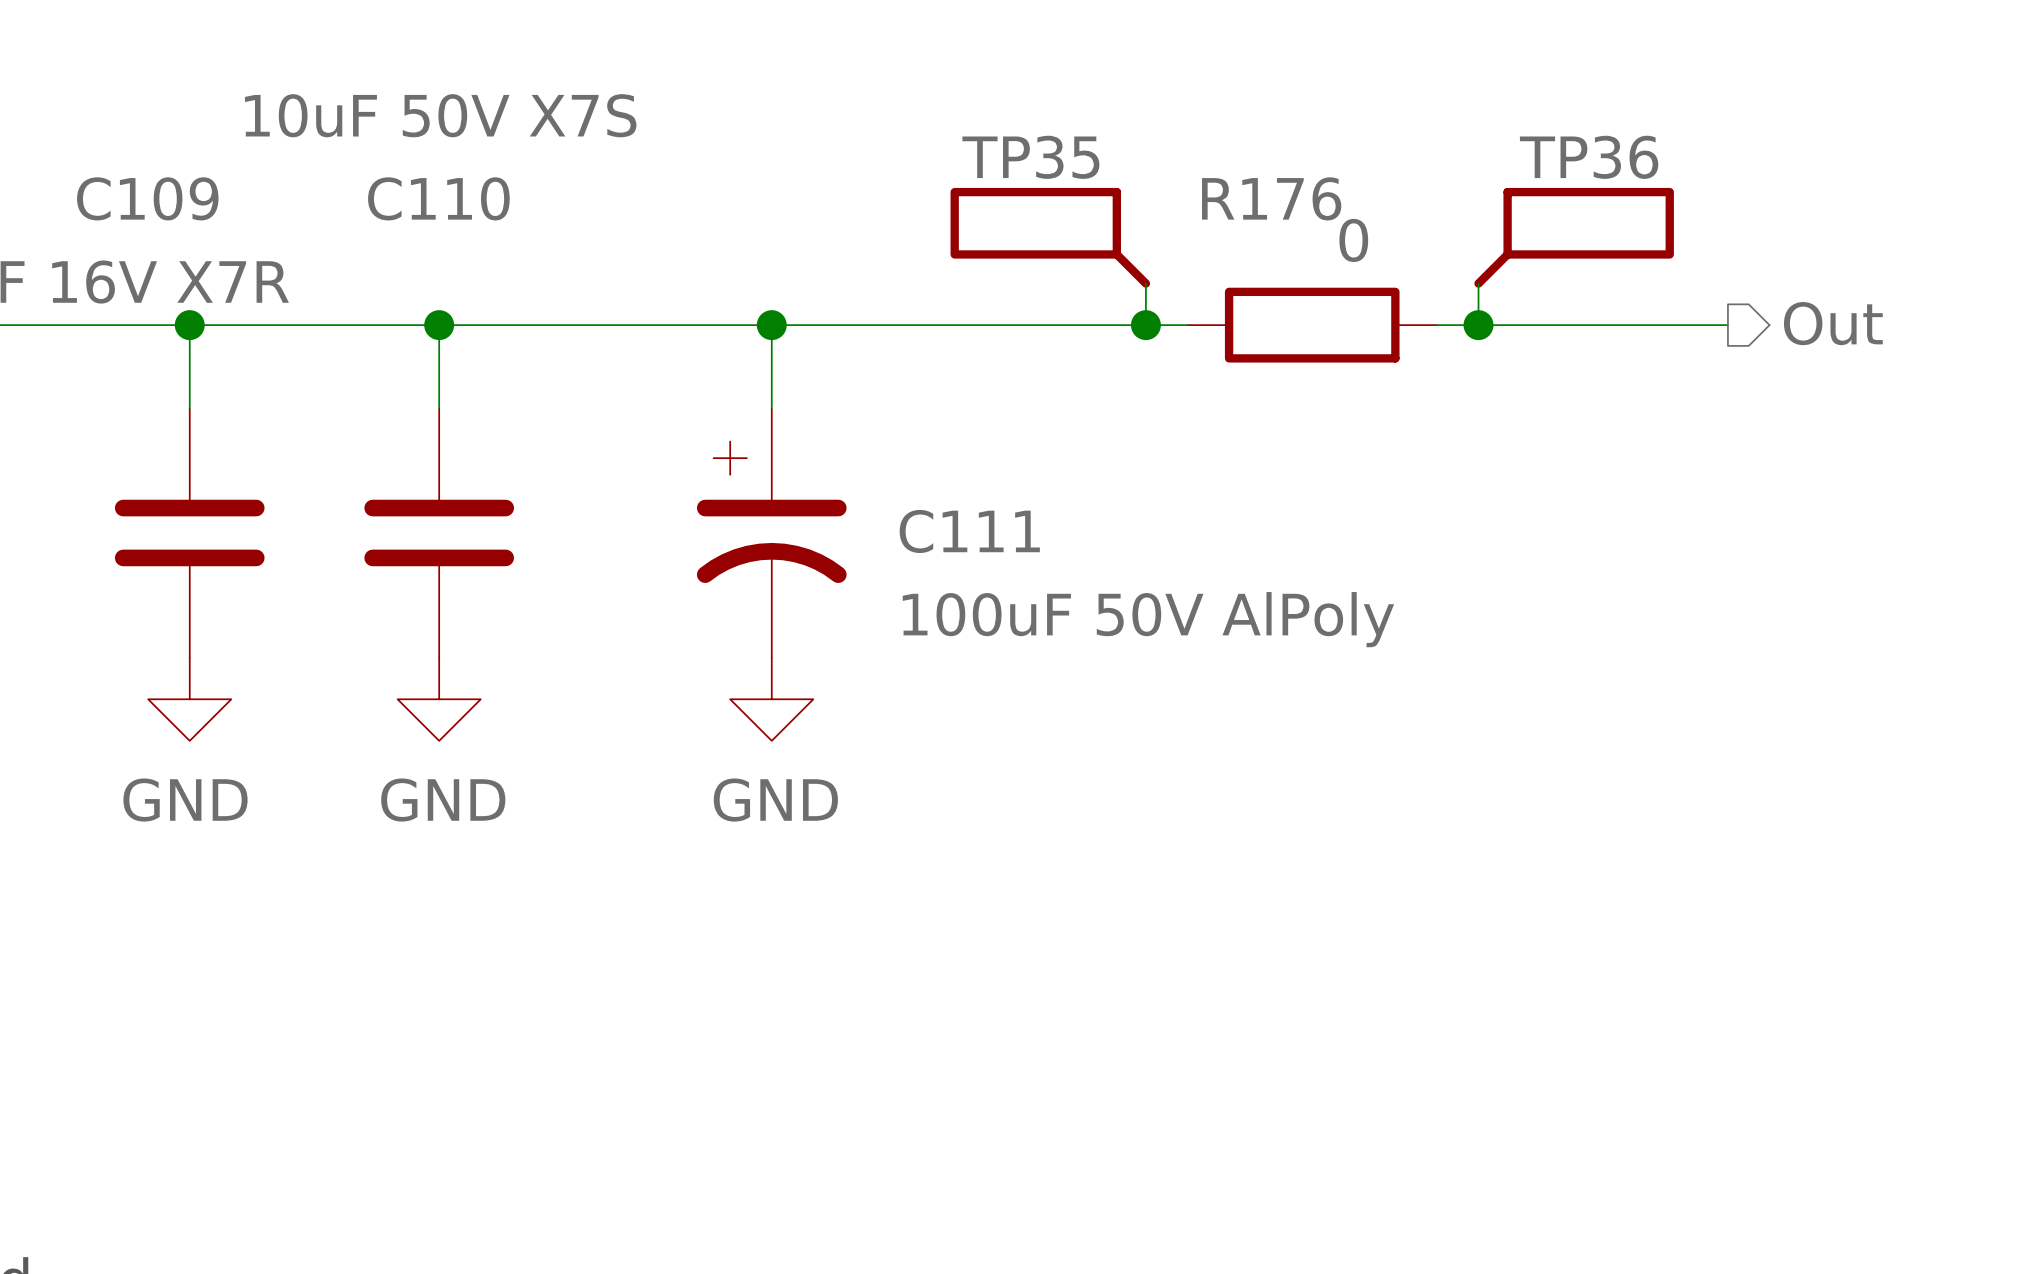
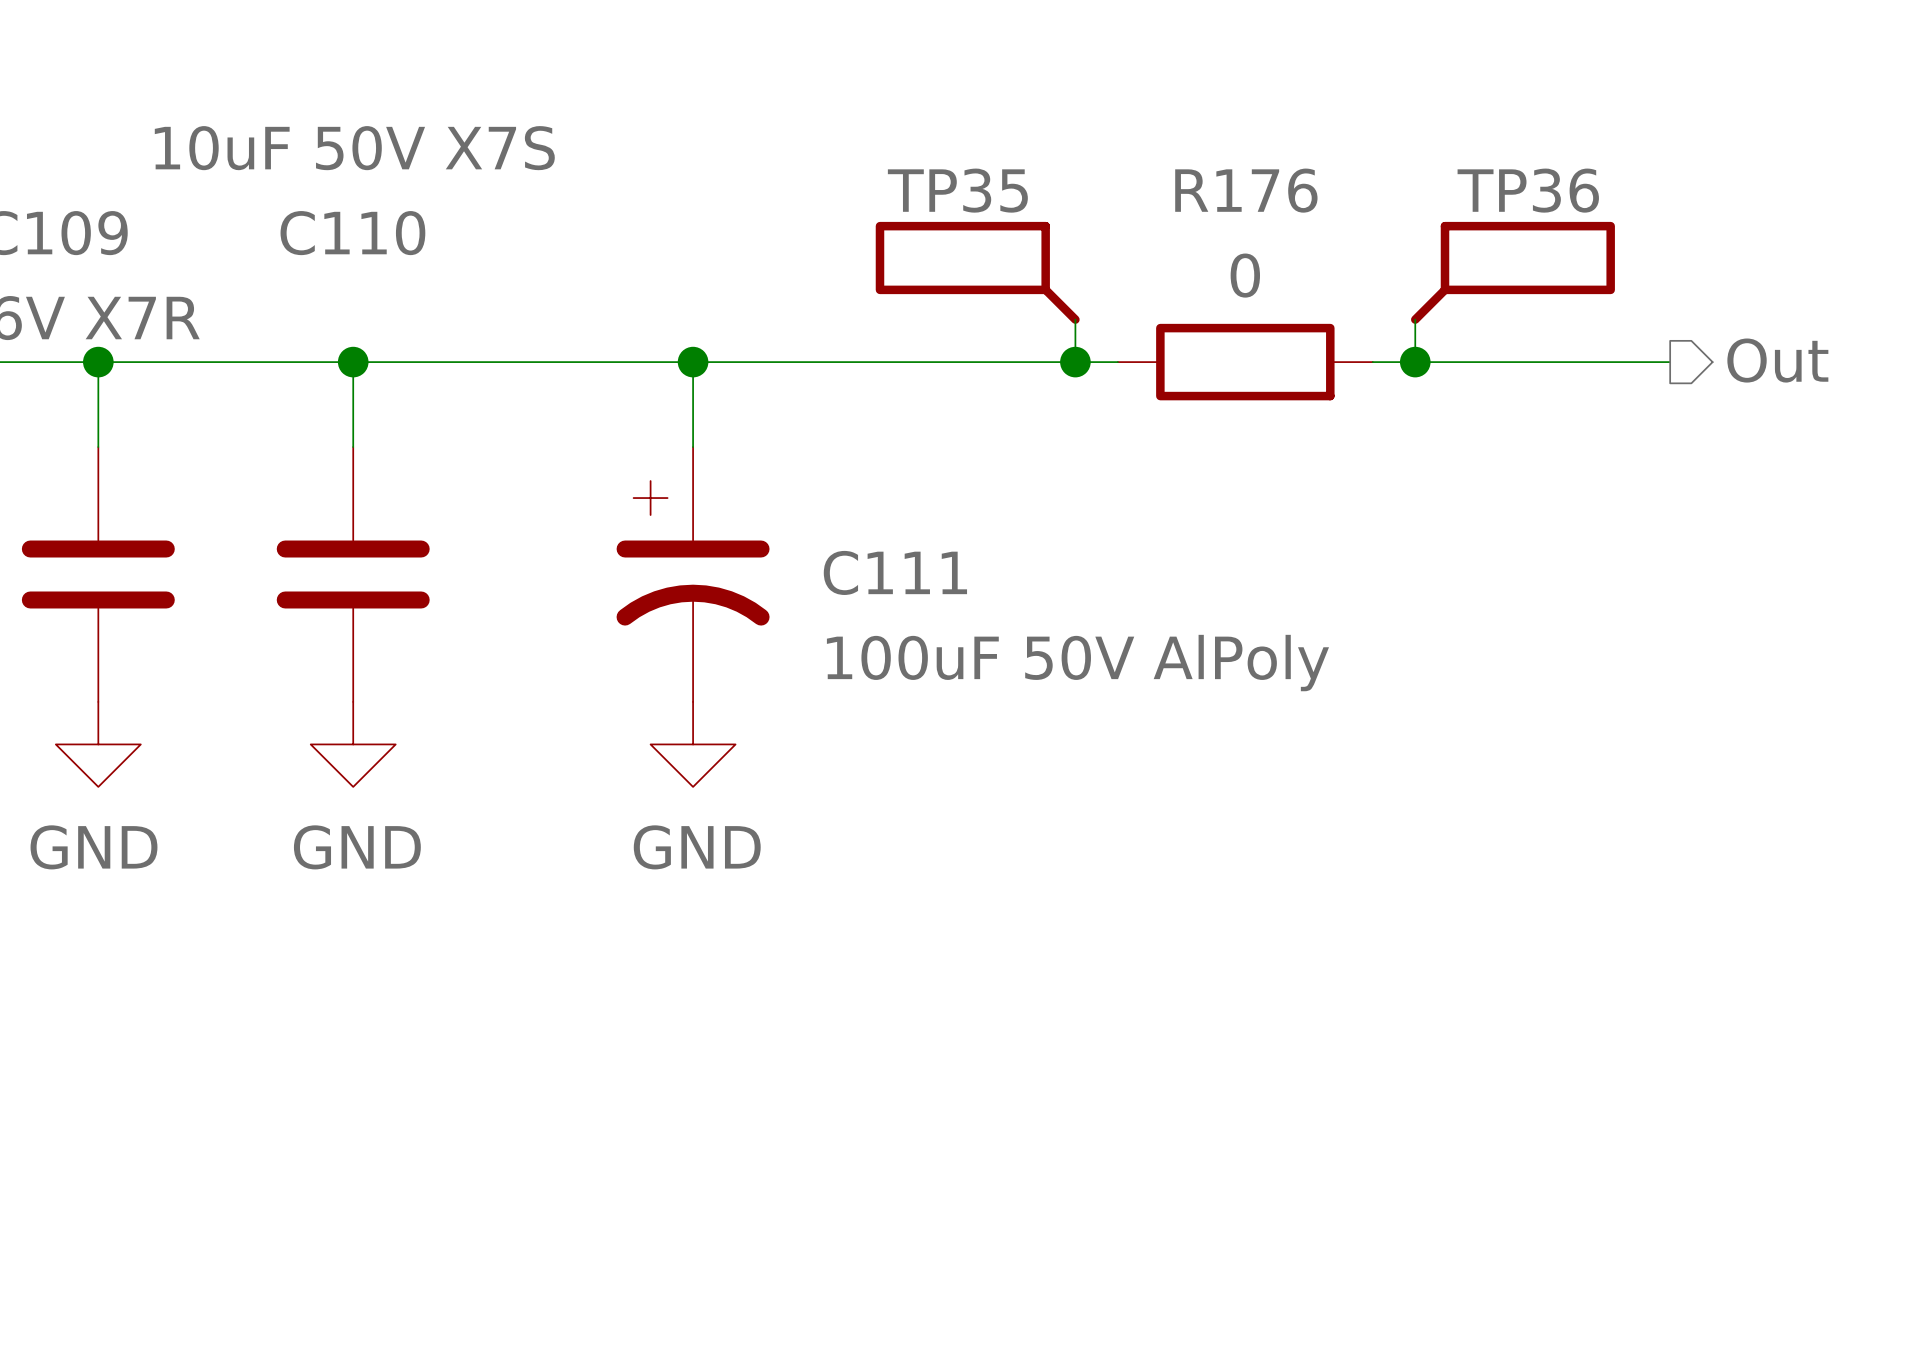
R176 name position: R176 (1271, 198) -> R176 (1246, 190)
R176 value position: 0 (1353, 240) -> 0 (1245, 275)

